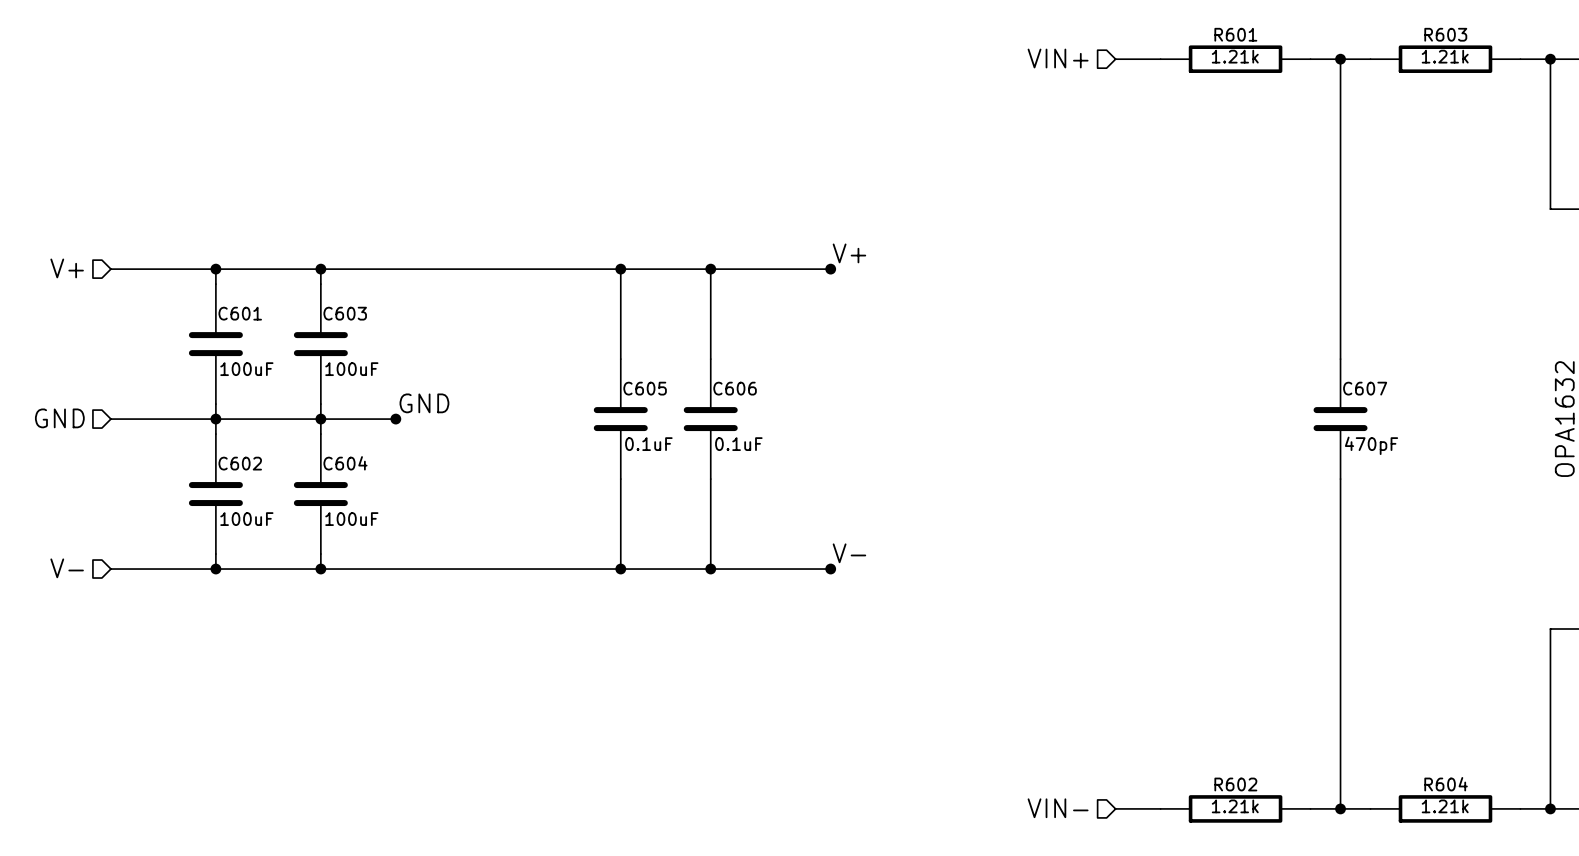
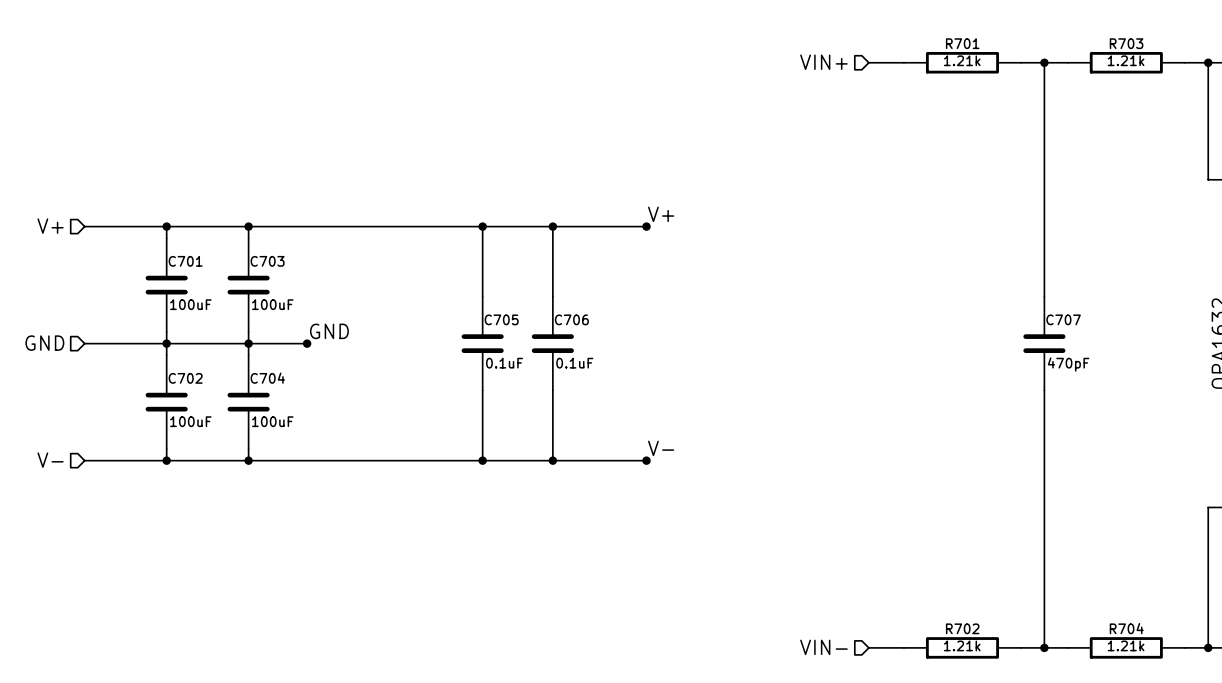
R601 name: R601 (1235, 34) -> R701 (962, 43)
R603 name: R603 (1445, 34) -> R703 (1126, 43)
C601 name: C601 (240, 313) -> C701 (185, 261)
C603 name: C603 (345, 313) -> C703 (267, 261)
C605 name: C605 (645, 388) -> C705 (501, 319)
C606 name: C606 (735, 388) -> C706 (571, 319)
C607 name: C607 (1365, 388) -> C707 (1063, 319)
C602 name: C602 (240, 463) -> C702 (185, 378)
C604 name: C604 (345, 463) -> C704 (267, 378)
R602 name: R602 (1235, 784) -> R702 (962, 628)
R604 name: R604 (1446, 784) -> R704 (1126, 628)

